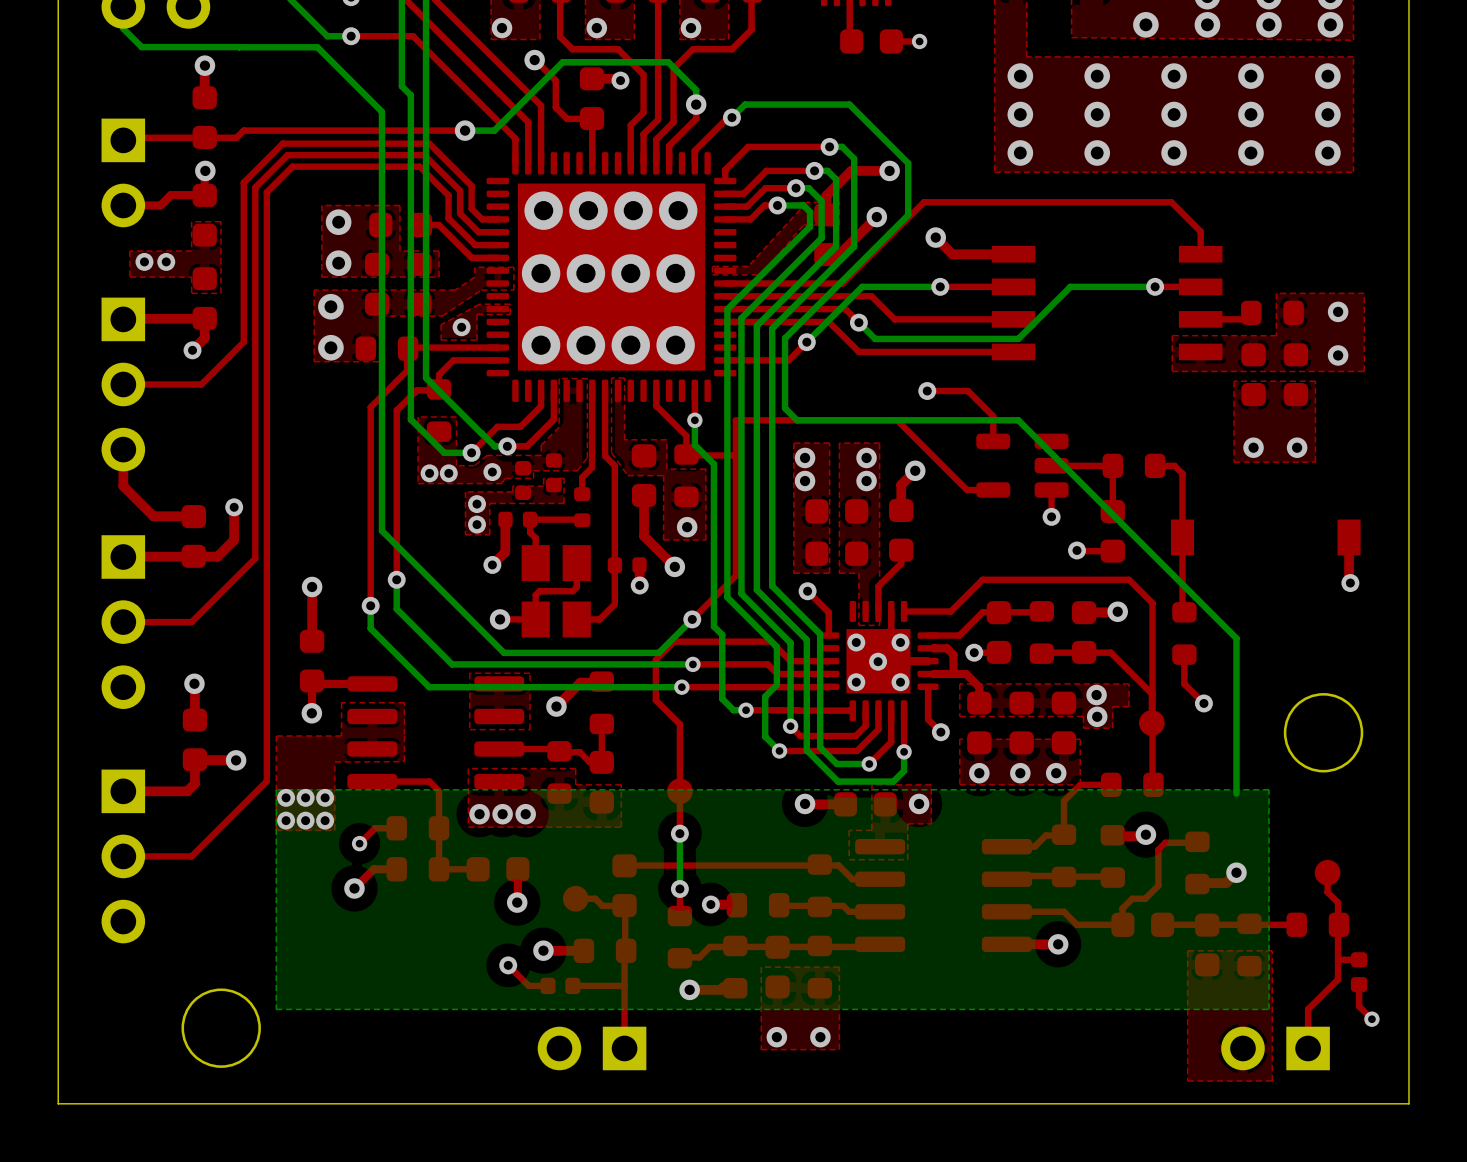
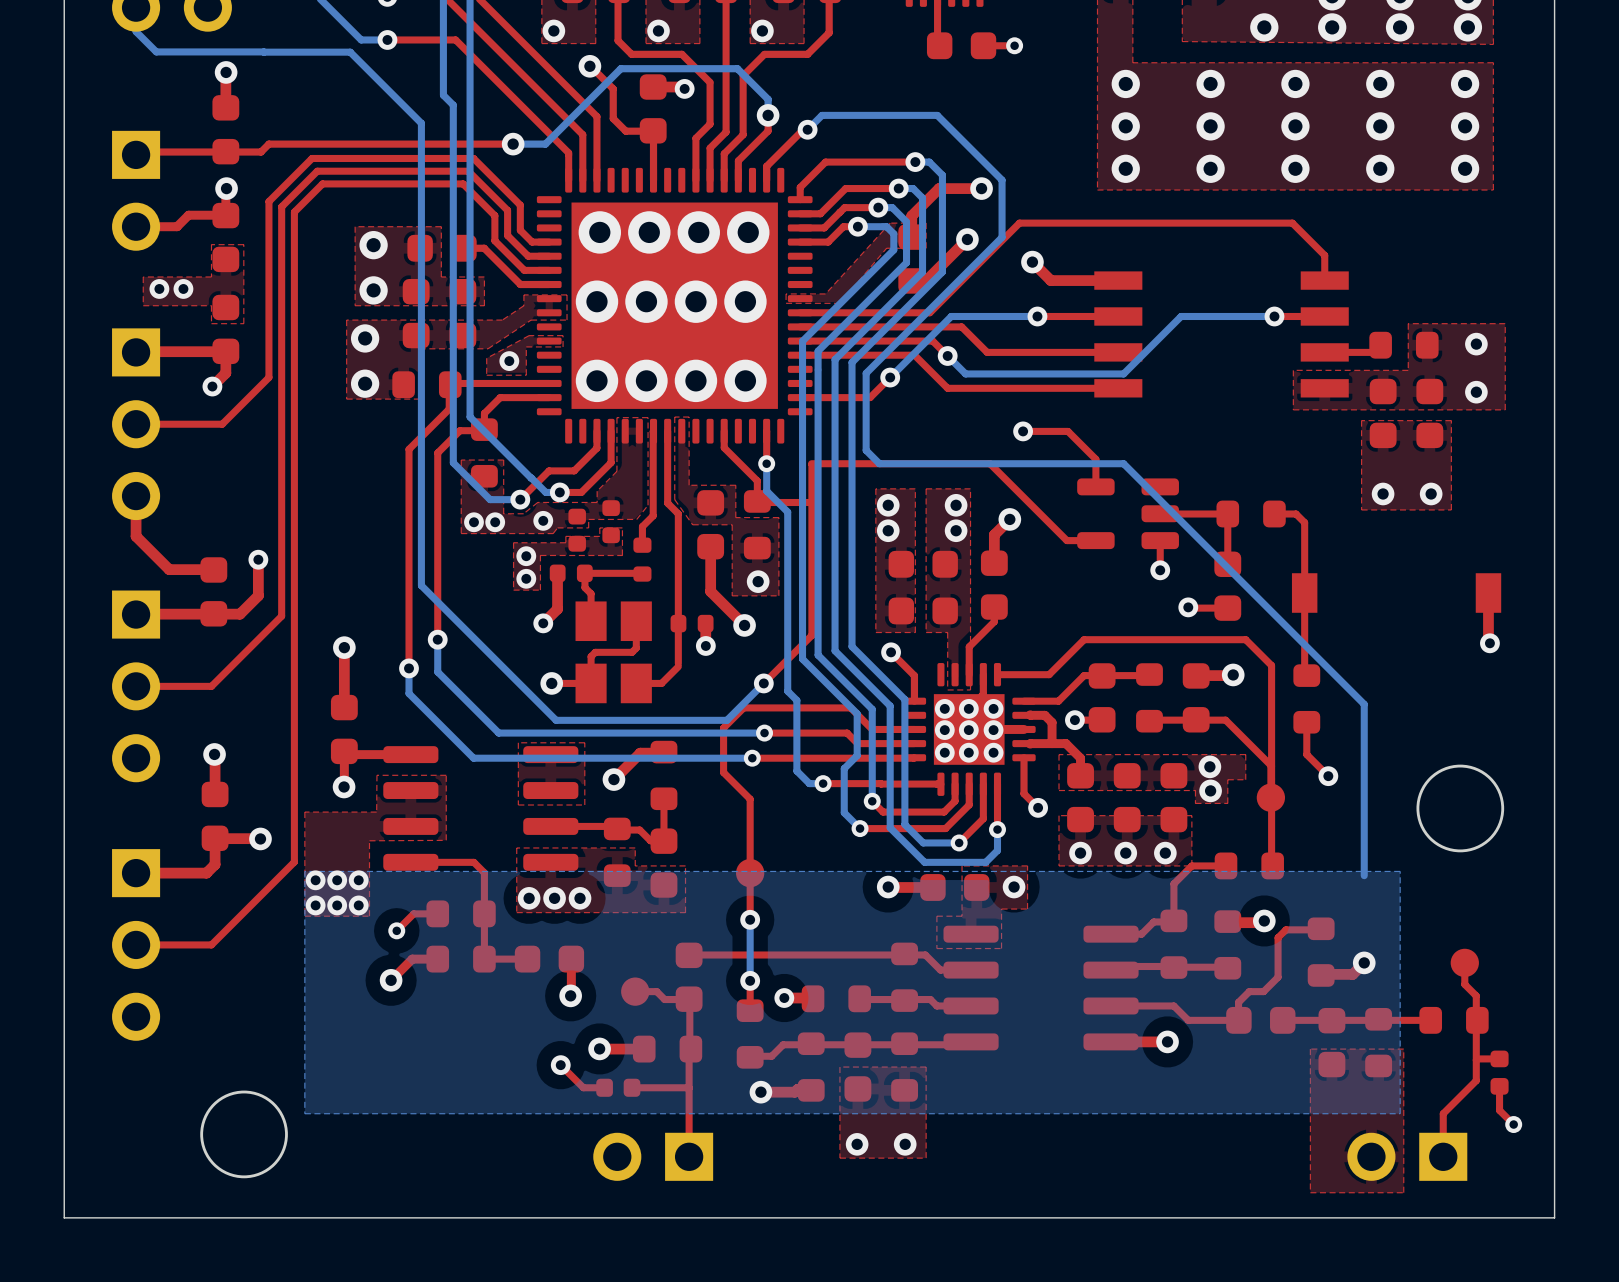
via: none -> (968, 708)
via: none -> (944, 730)
via: none -> (993, 730)
via: none -> (968, 752)

